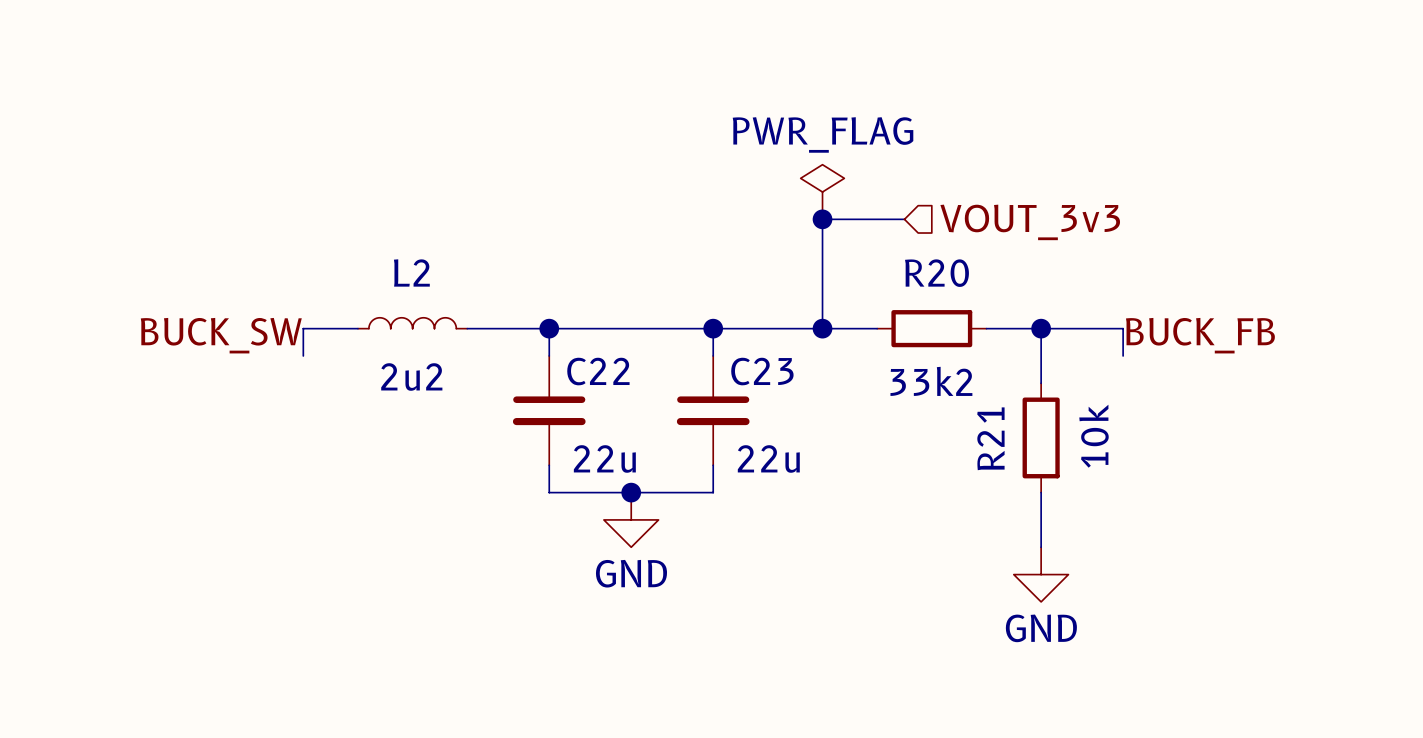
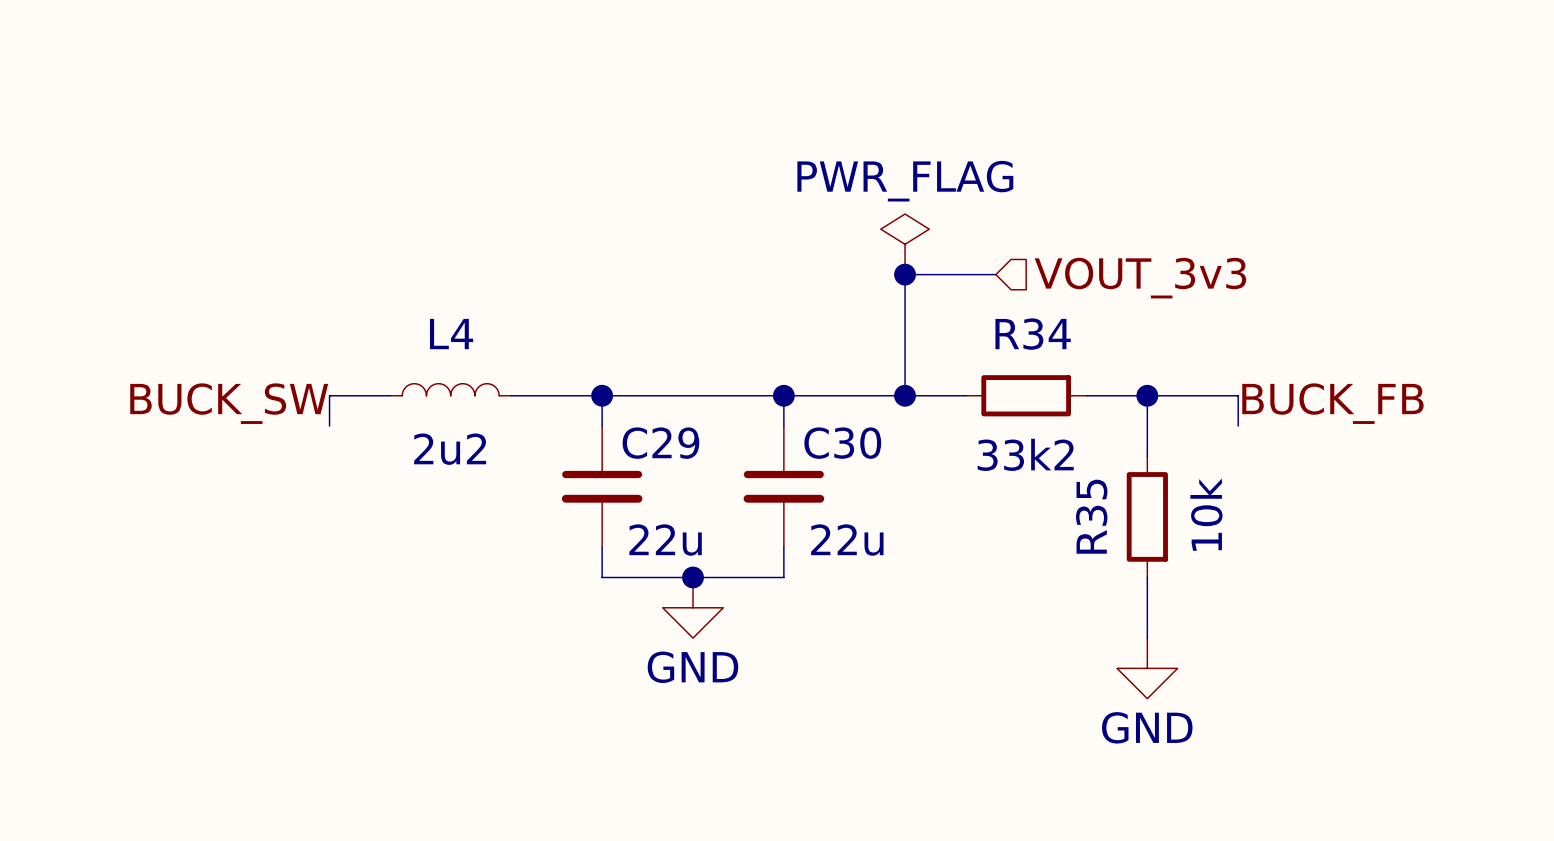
L2 name: L2 (411, 272) -> L4 (451, 334)
R20 name: R20 (936, 273) -> R34 (1033, 334)
C22 name: C22 (598, 371) -> C29 (660, 443)
C23 name: C23 (762, 371) -> C30 (842, 443)
R21 name: R21 (990, 438) -> R35 (1091, 516)

